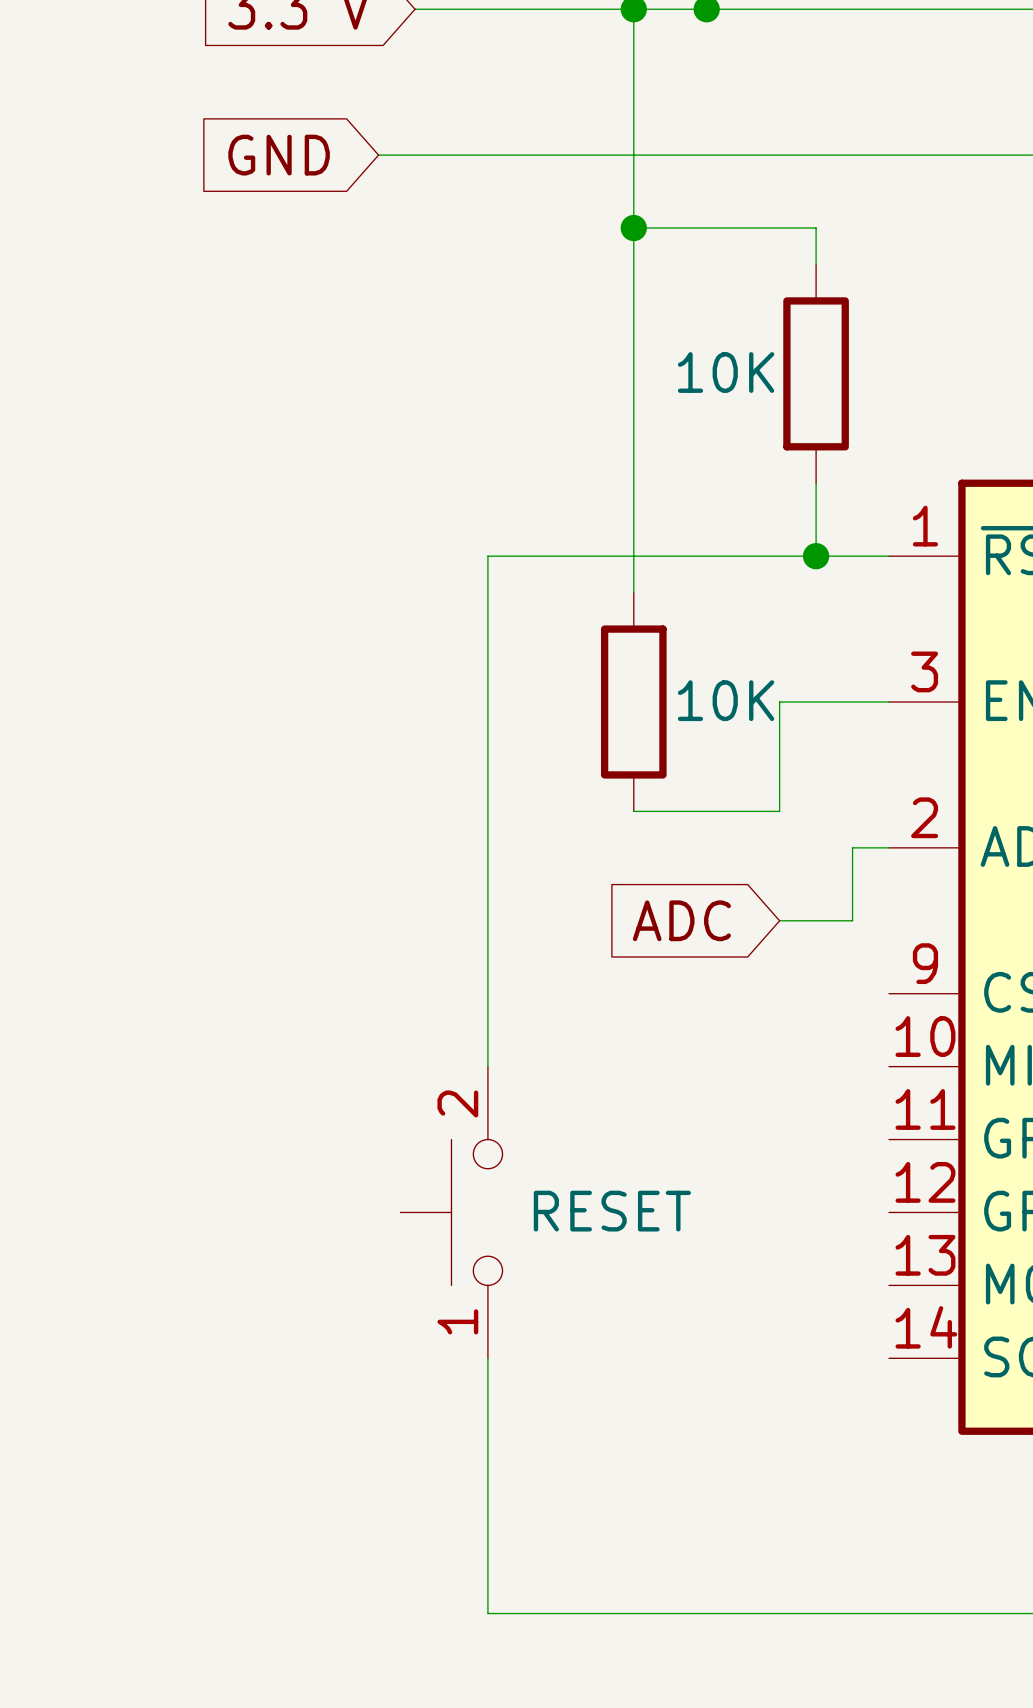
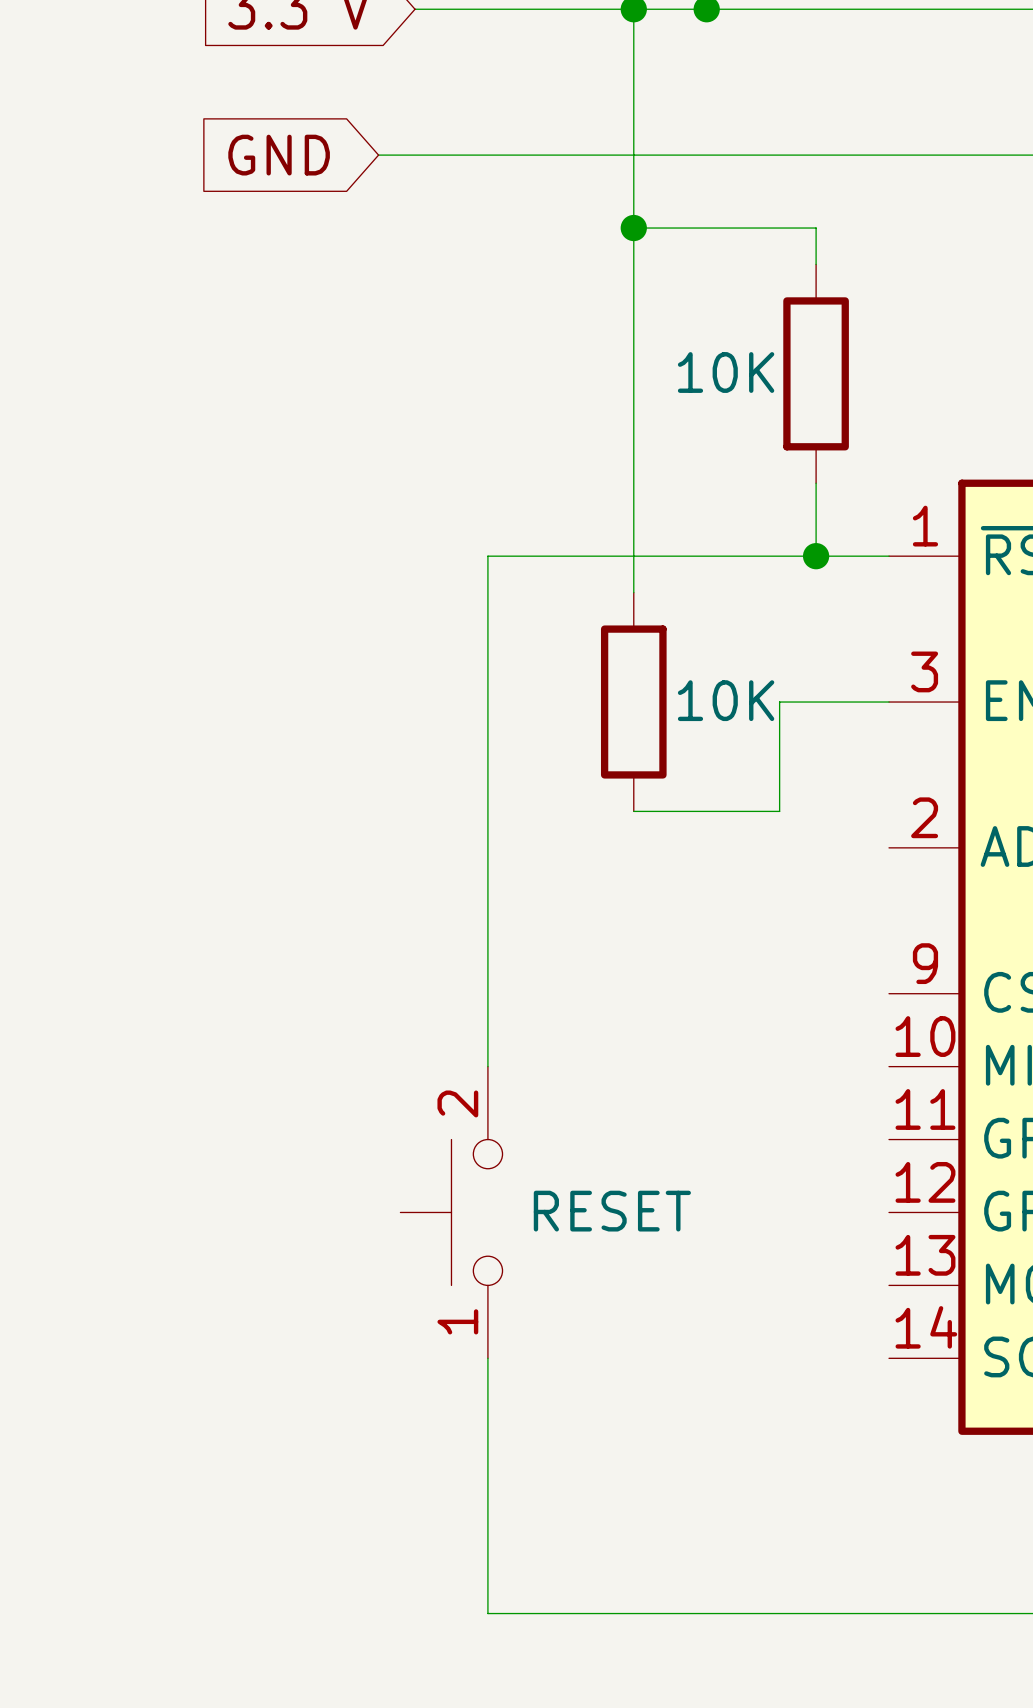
wire: (889, 847) (852, 847) (852, 920) (779, 920) -> none
global label: ADC (681, 920) -> none

